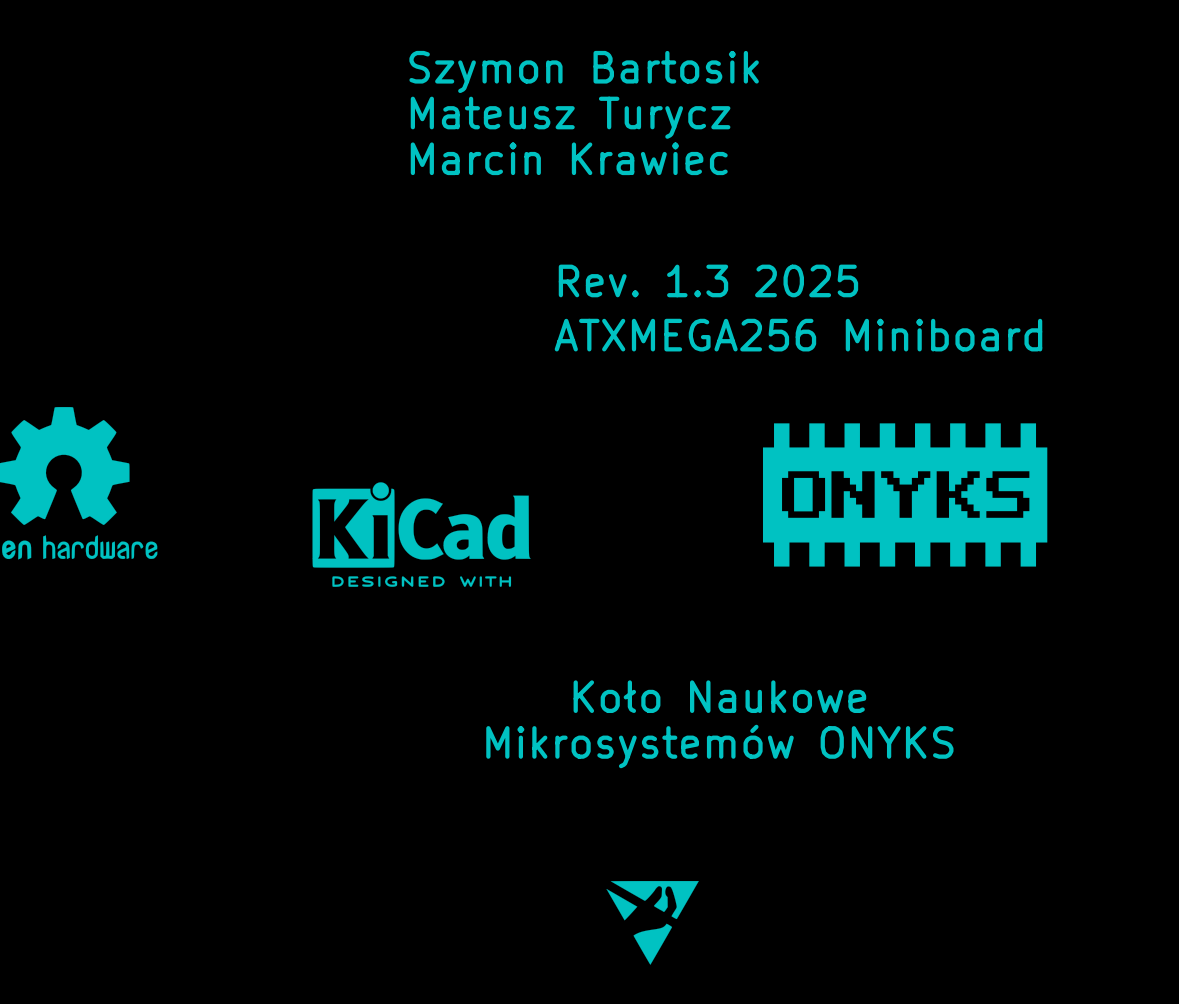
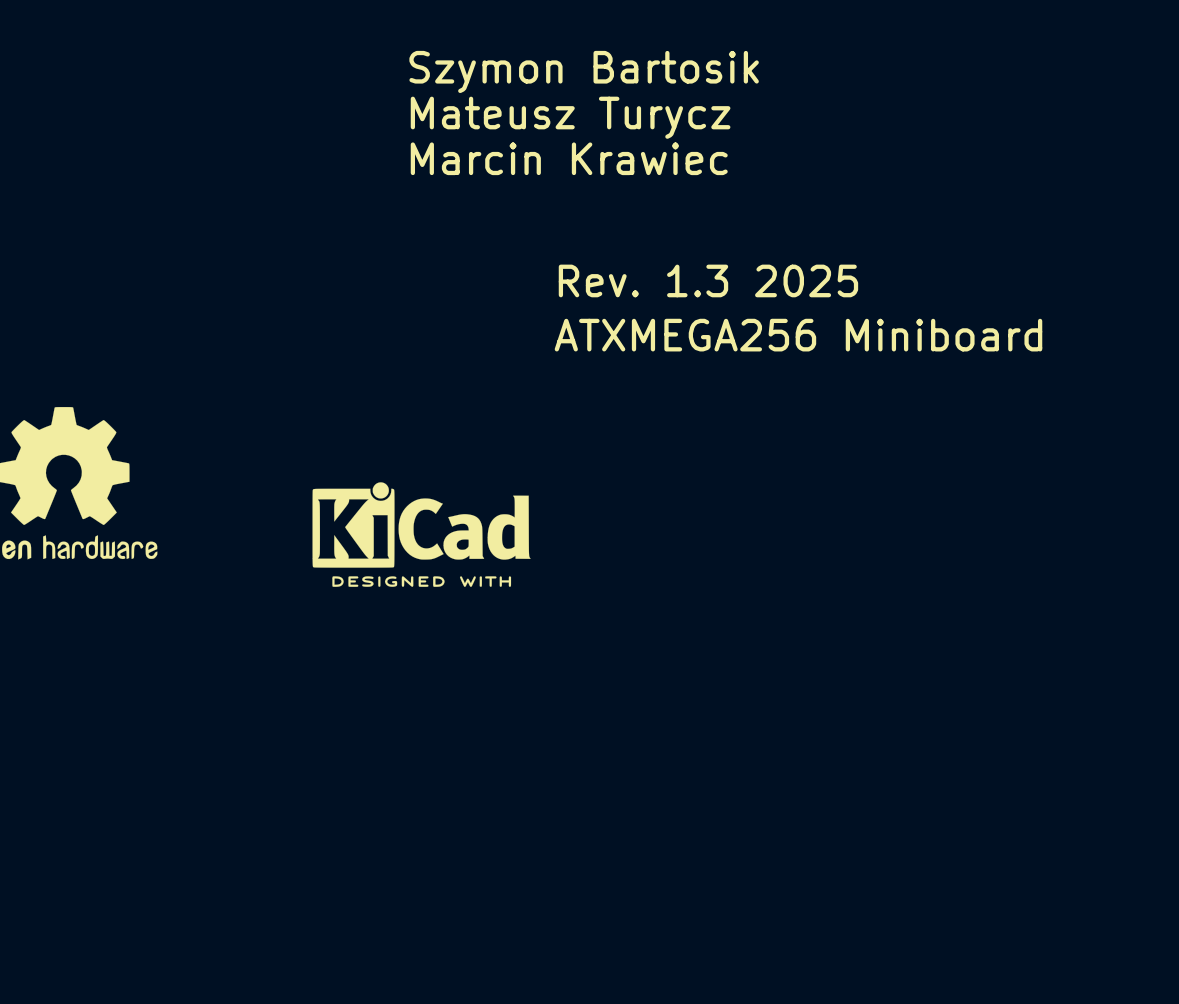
drawing: [762, 423, 1048, 567] -> none
text: Koło Naukowe (719, 696) -> none
text: Mikrosystemów ONYKS (719, 746) -> none
drawing: [606, 881, 699, 965] -> none

